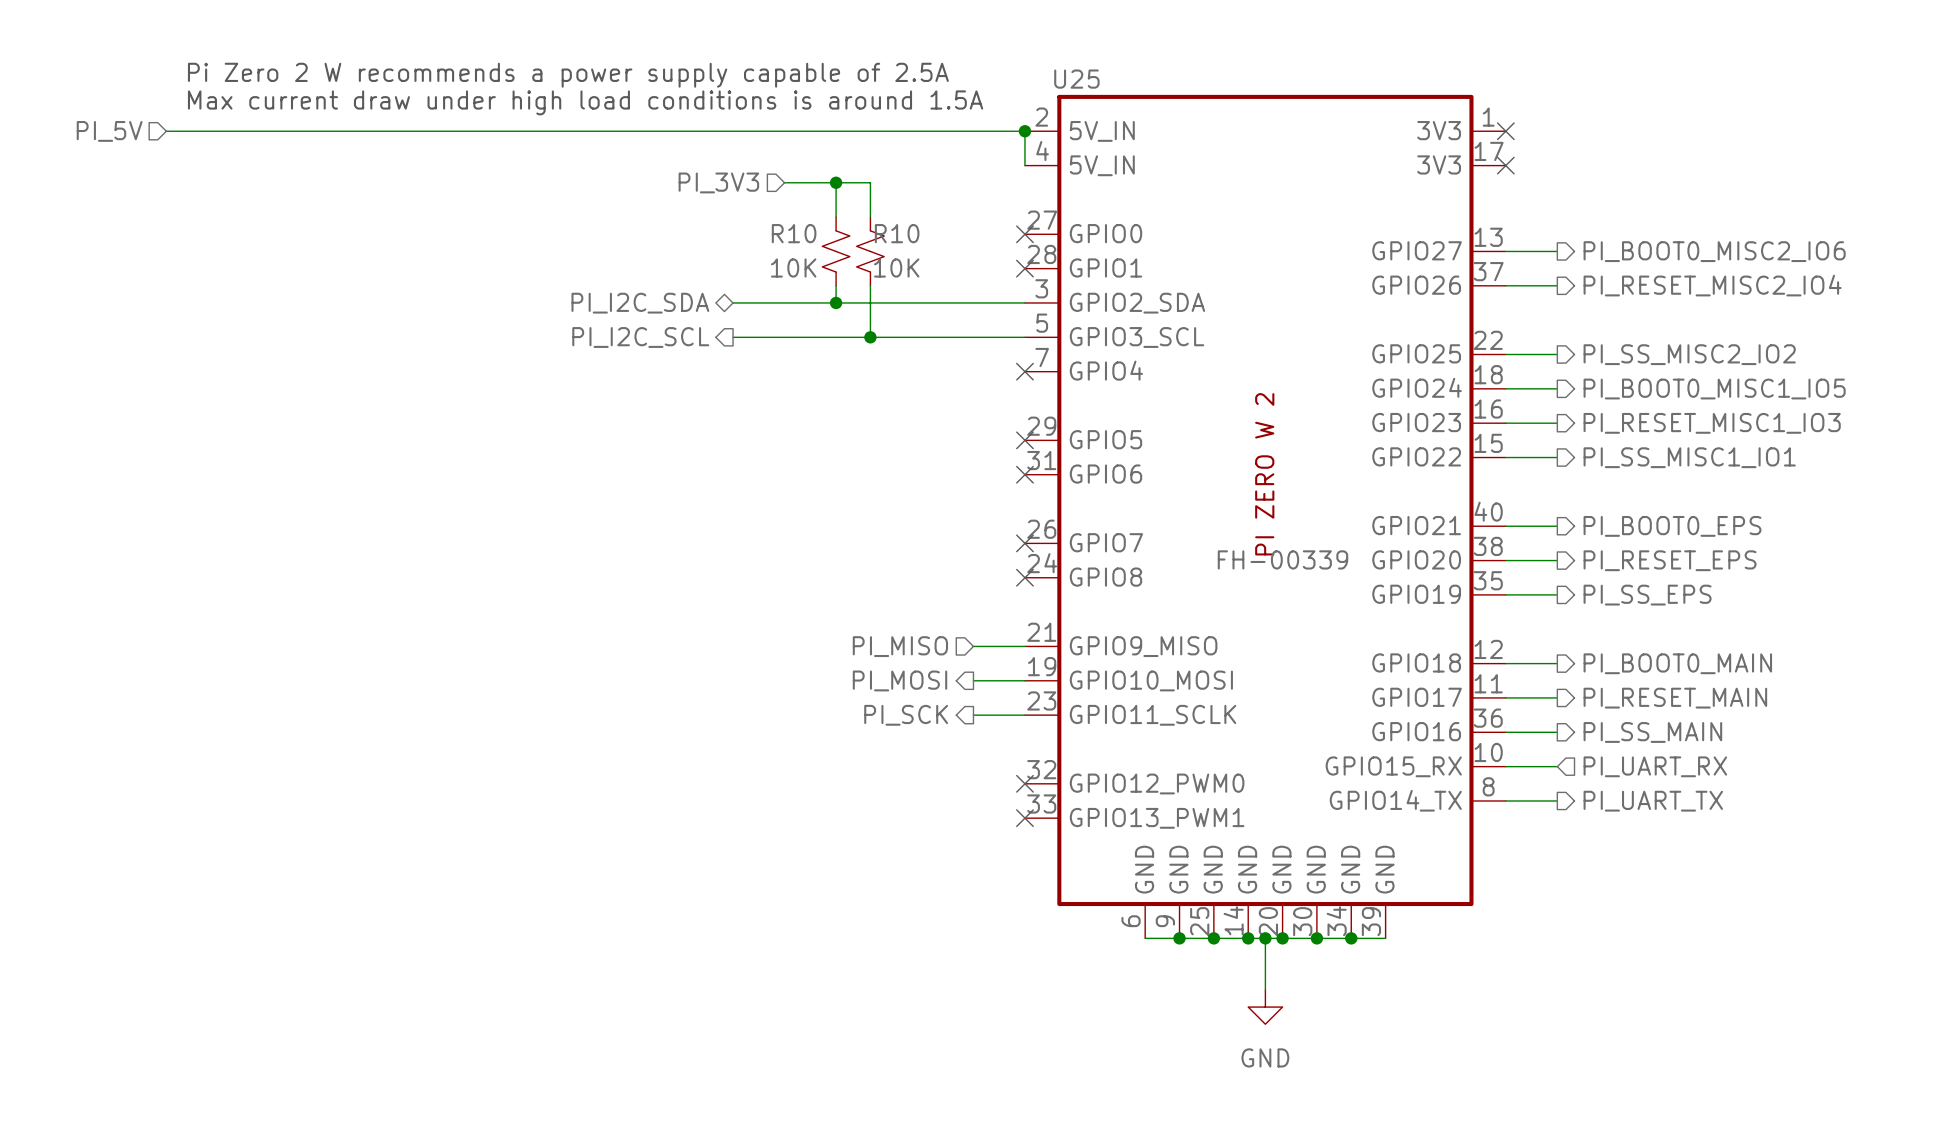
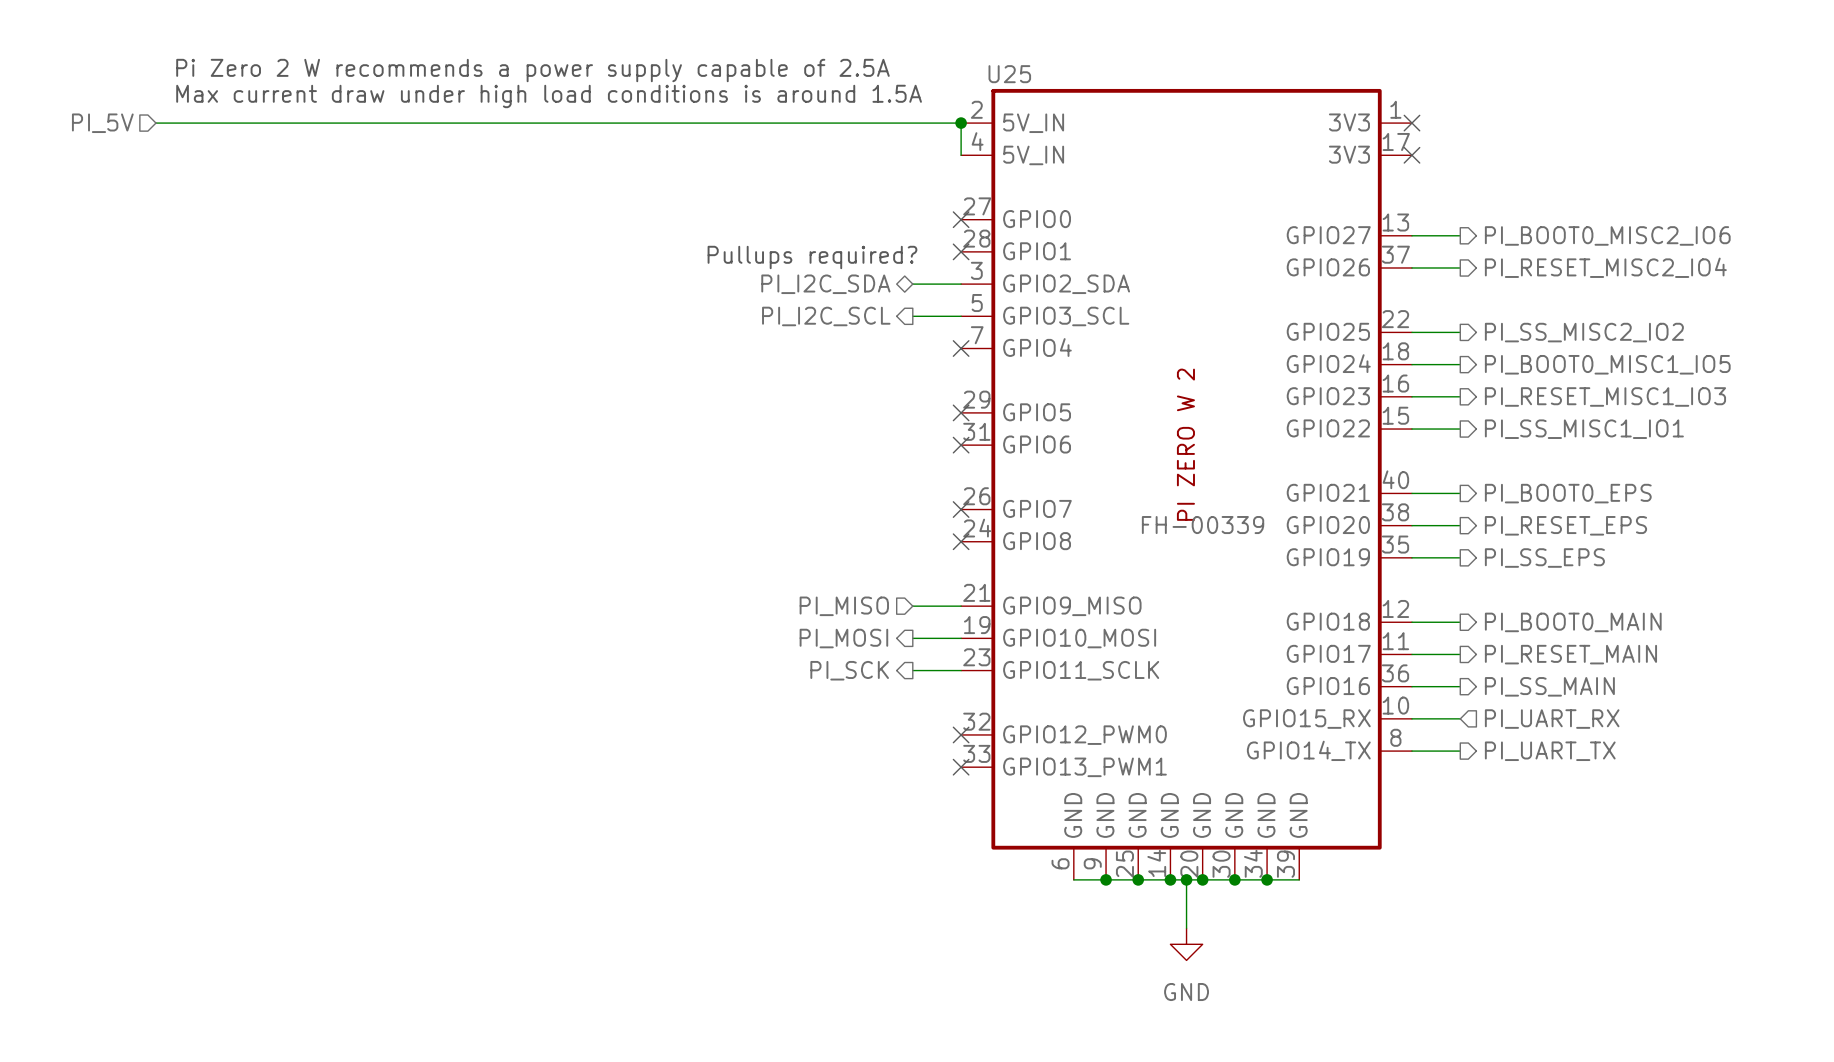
hierarchical label: PI_3V3 (718, 182) -> none
wire: (784, 182) (870, 182) (870, 217) -> none
wire: (836, 182) (836, 217) -> none
junction: (836, 182) -> none
R10: 10K (836, 251) -> none
R10: 10K (870, 251) -> none
text: none -> Pullups required? (812, 257)
wire: (836, 285) (836, 302) -> none
wire: (870, 285) (870, 337) -> none
wire: (733, 302) (973, 302) -> none
junction: (836, 302) -> none
hierarchical label position: PI_I2C_SDA (640, 303) -> PI_I2C_SDA (825, 284)
hierarchical label position: PI_I2C_SCL (640, 337) -> PI_I2C_SCL (826, 316)
wire: (733, 337) (973, 337) -> none
junction: (870, 337) -> none

